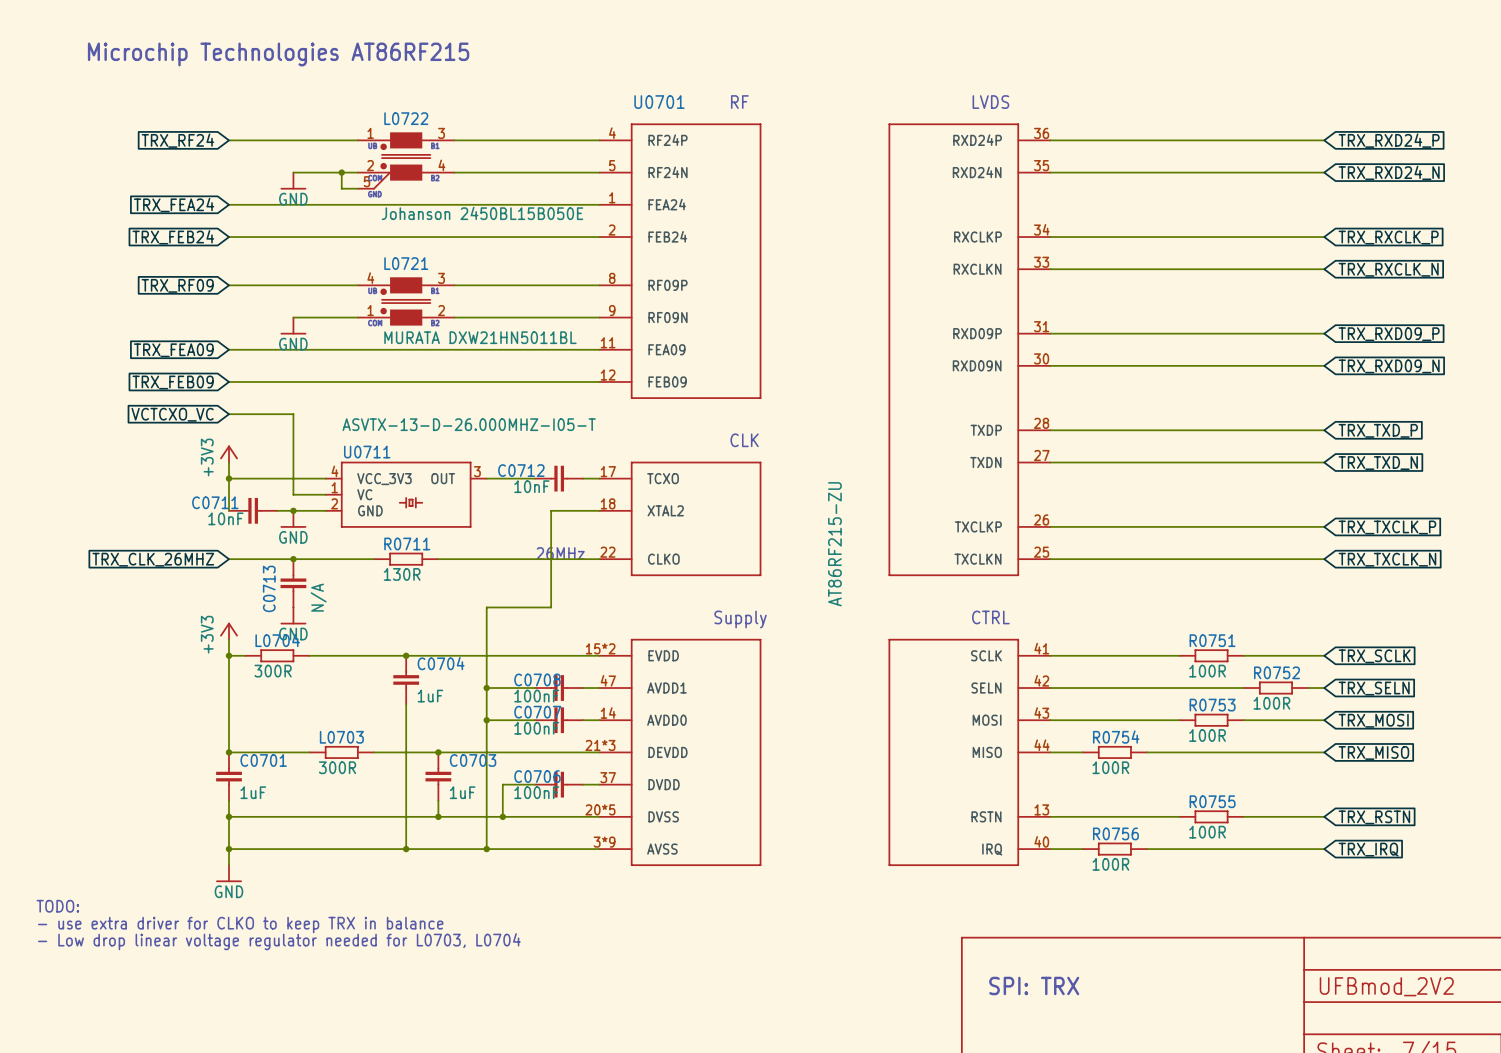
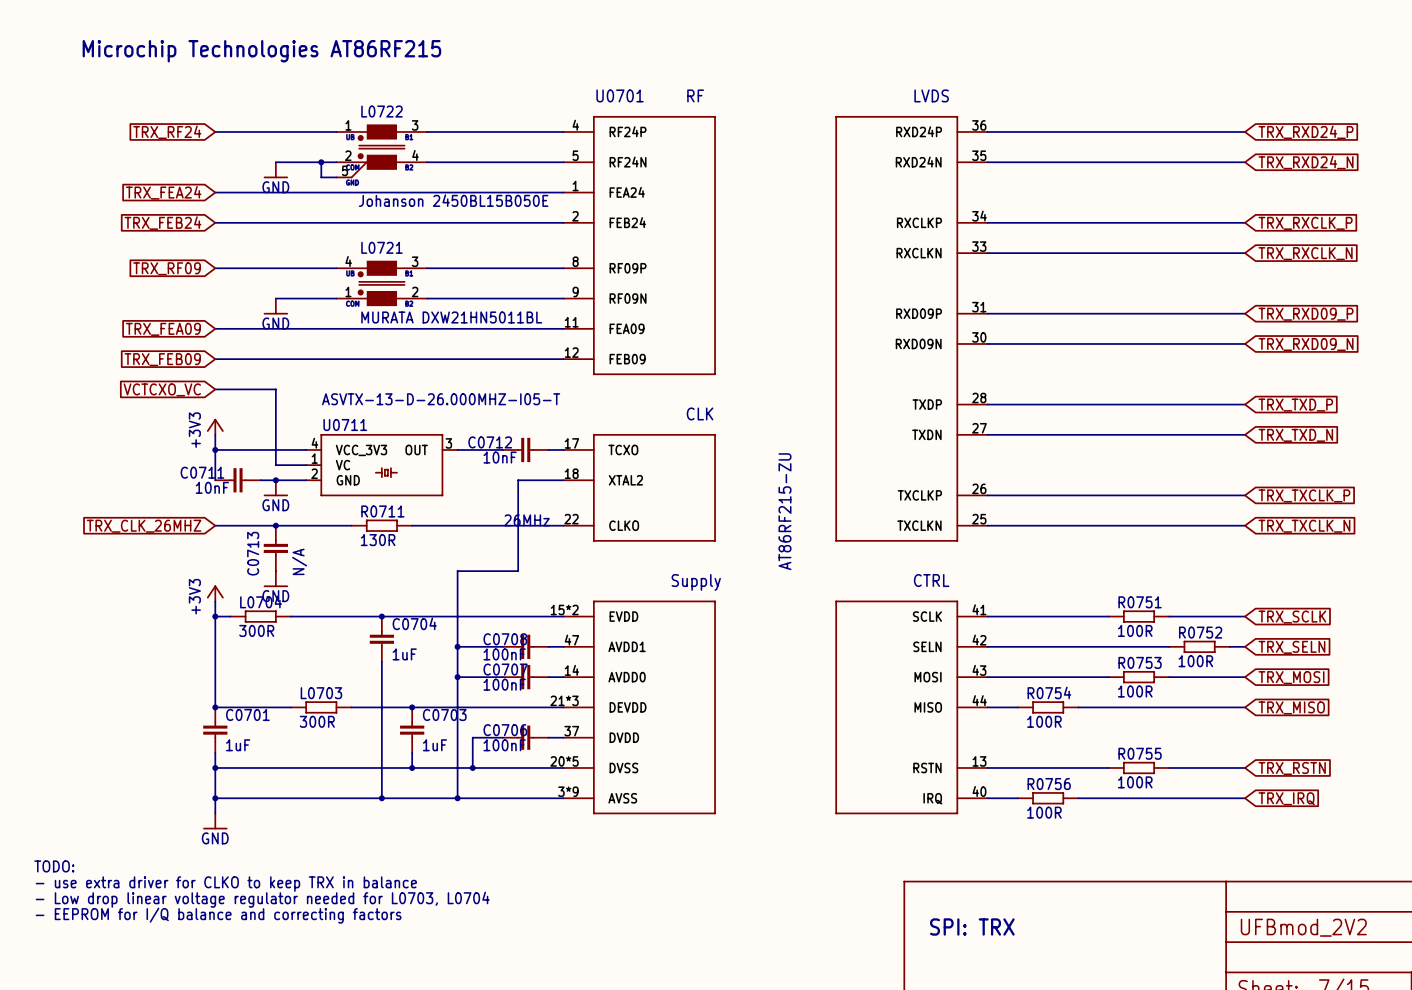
text: TODO: (57, 906) -> none
text: - use extra driver for CLKO to keep TRX in balance (240, 925) -> TODO: (54, 866)
text: - Low drop linear voltage regulator needed for L0703, L0704 (279, 941) -> - use extra driver for CLKO to keep TRX in balance (226, 884)
text: none -> - Low drop linear voltage regulator needed for L0703, L0704 (262, 899)
text: none -> - EEPROM for I/Q balance and correcting factors (218, 915)

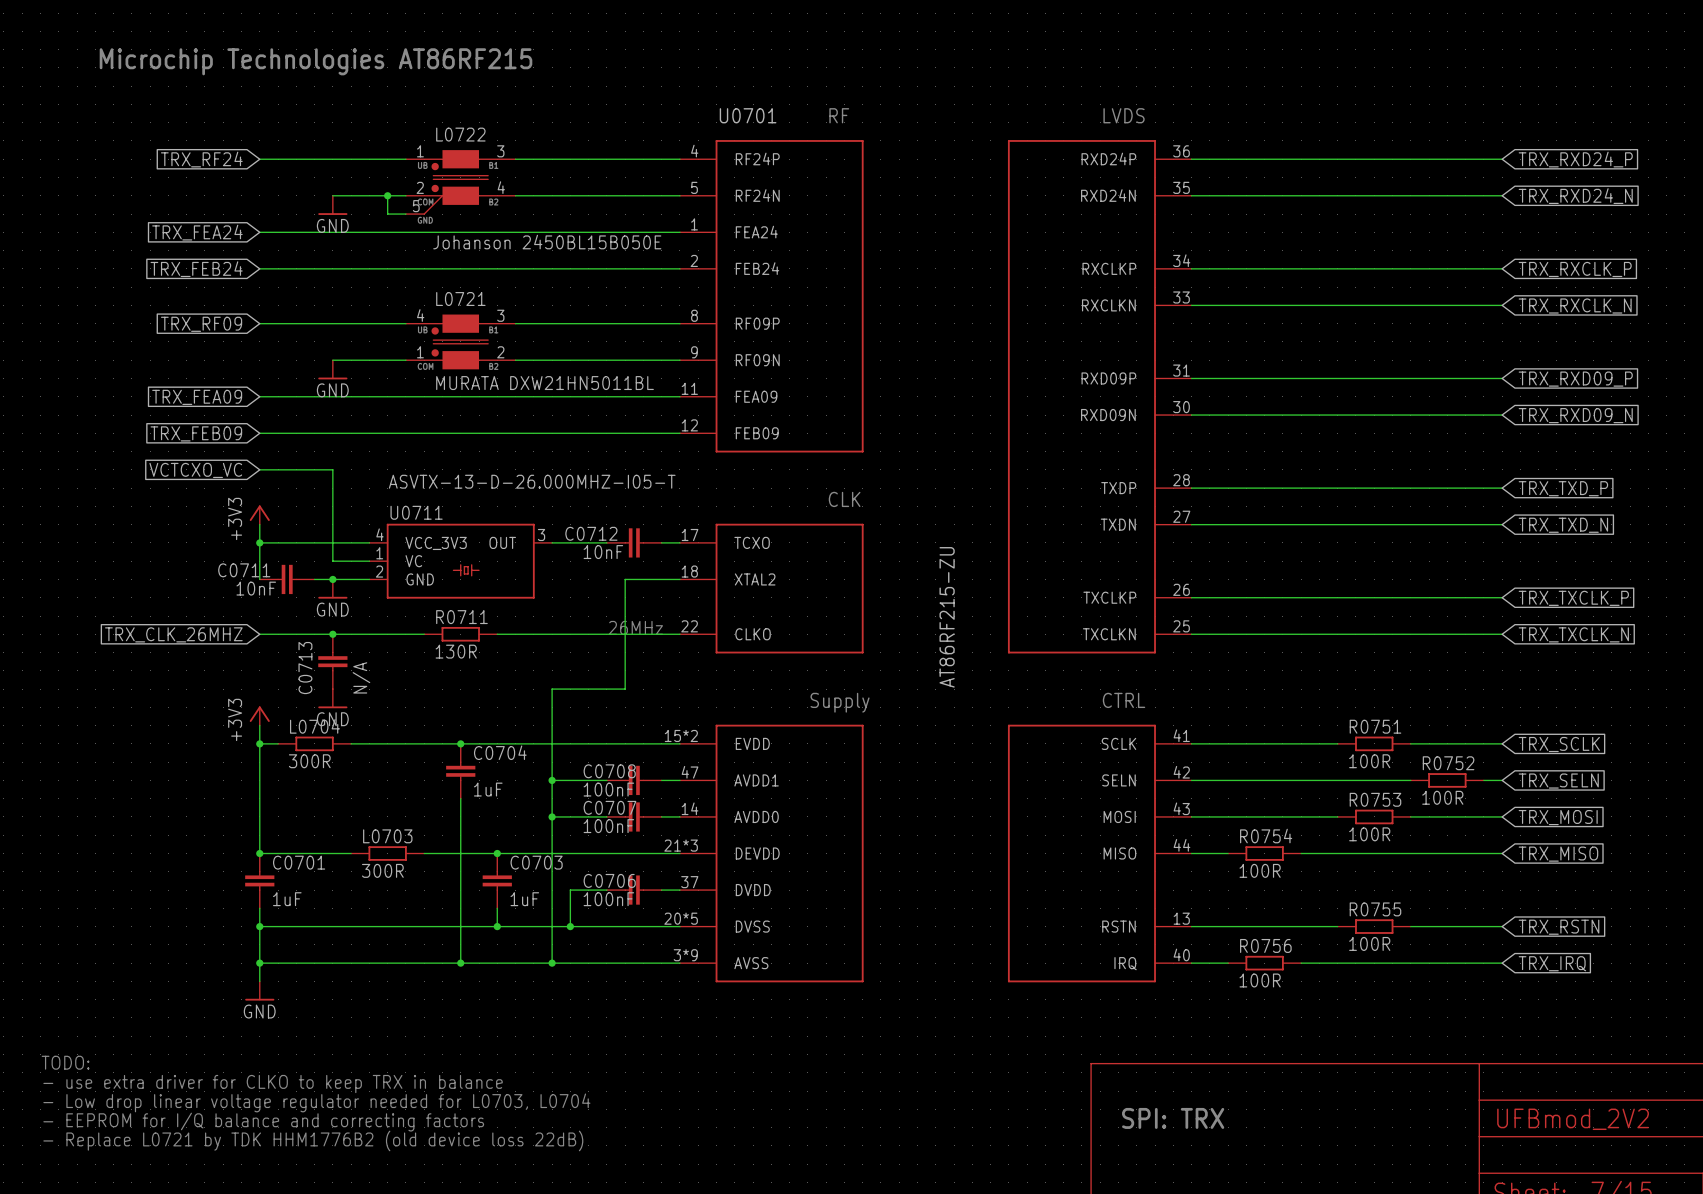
text: TODO: (54, 866) -> none
text: - use extra driver for CLKO to keep TRX in balance (226, 884) -> TODO: (65, 1062)
text: - Low drop linear voltage regulator needed for L0703, L0704 (262, 899) -> - use extra driver for CLKO to keep TRX in balance (273, 1084)
text: - EEPROM for I/Q balance and correcting factors (218, 915) -> - Low drop linear voltage regulator needed for L0703, L0704 (316, 1102)
text: none -> - EEPROM for I/Q balance and correcting factors (263, 1122)
text: none -> - Replace L0721 by TDK HHM1776B2 (old device loss 22dB) (313, 1140)

